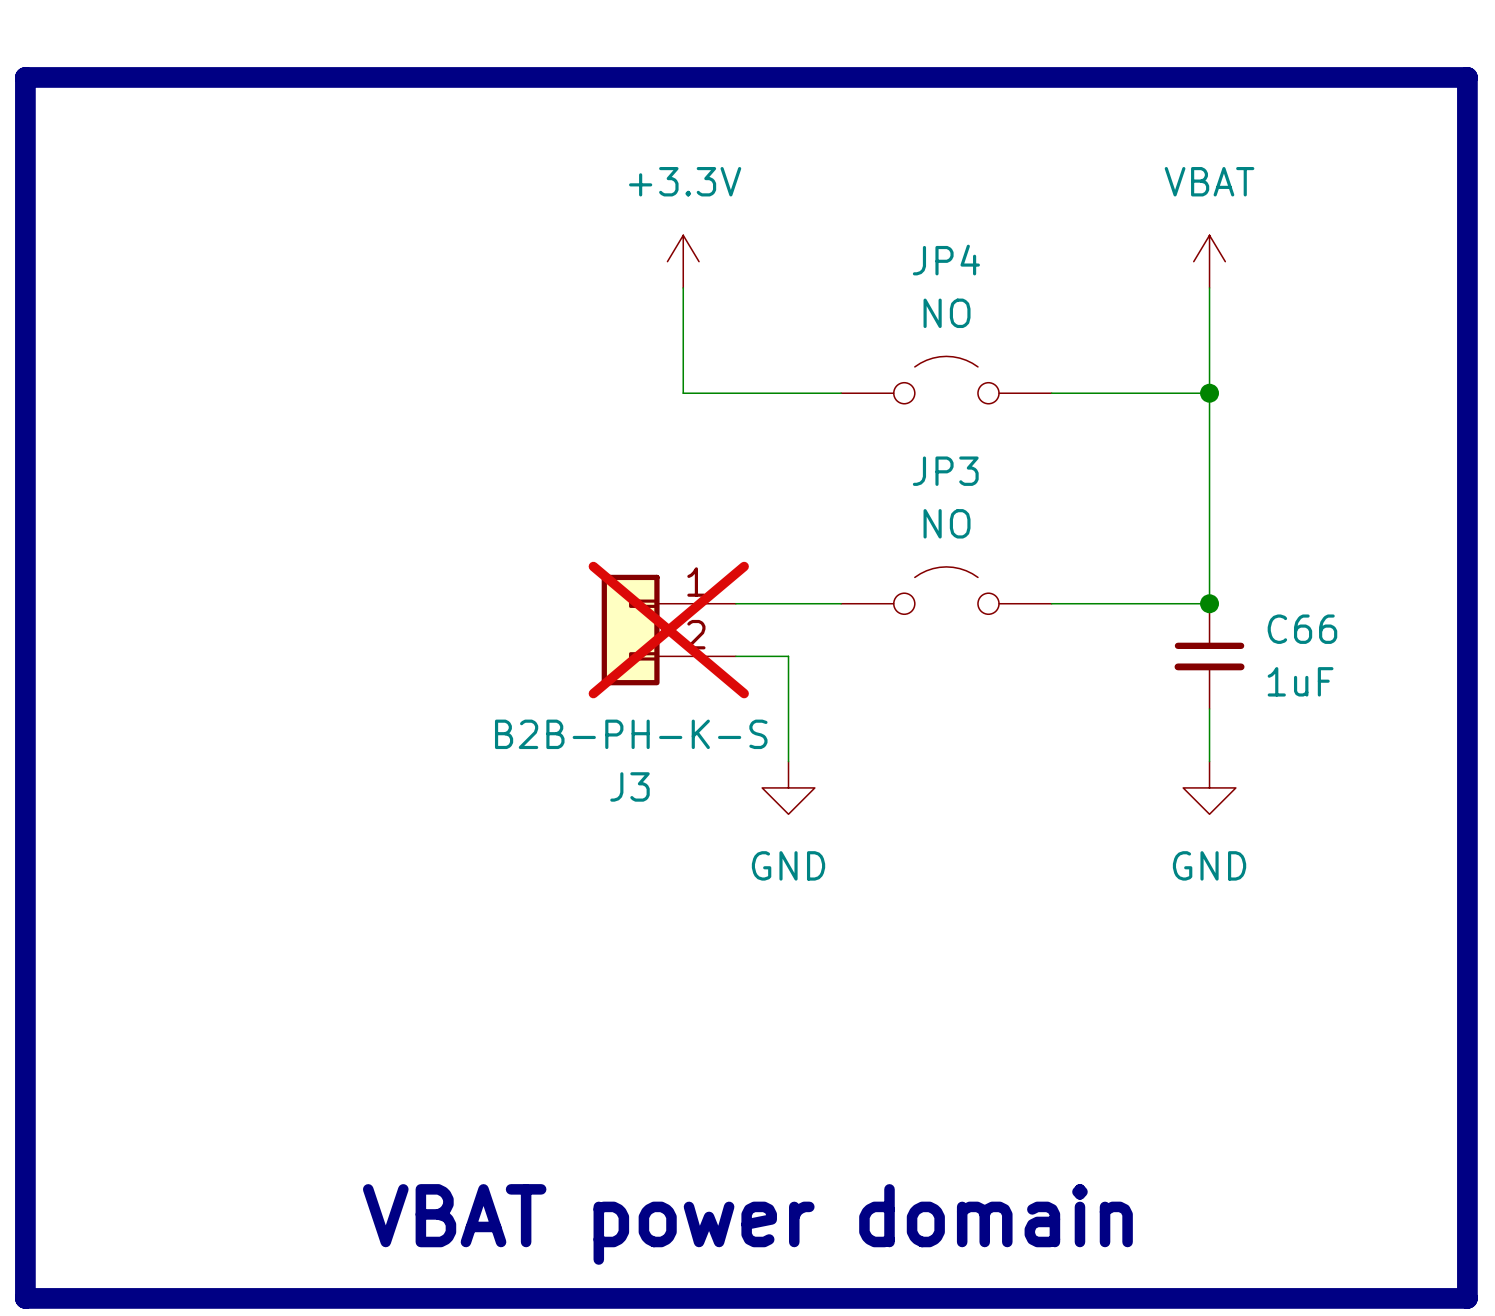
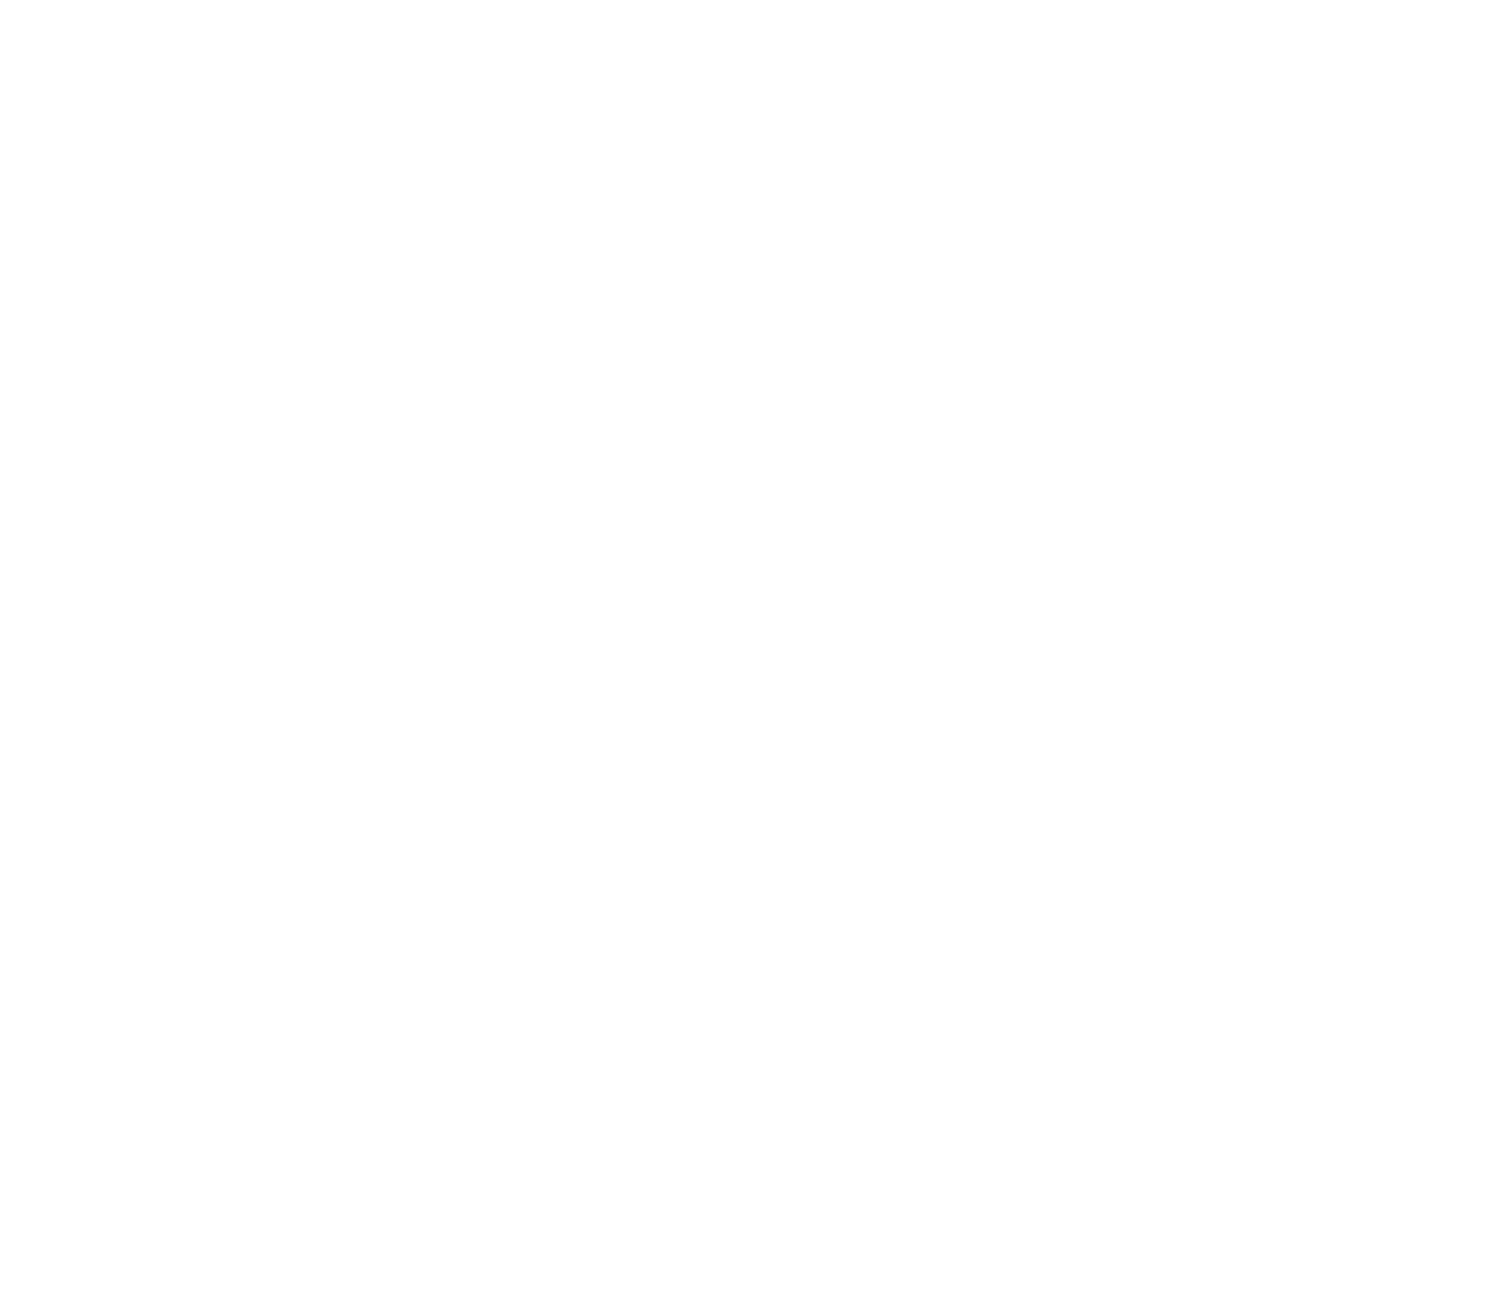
line: (25, 77) (1467, 77) (1467, 1298) (25, 1298) (25, 77) -> none
power symbol: +3.3V (683, 261) -> none
power symbol: VBAT (1209, 261) -> none
wire: (683, 287) (683, 393) (841, 393) -> none
wire: (1209, 287) (1209, 603) (1051, 603) -> none
JP4: NO (946, 380) -> none
wire: (1051, 393) (1209, 393) -> none
junction: (1209, 393) -> none
JP3: NO (946, 590) -> none
wire: (735, 603) (841, 603) -> none
junction: (1209, 603) -> none
J3: B2B-PH-K-S (668, 630) -> none
wire: (735, 656) (788, 656) (788, 761) -> none
C66: 1uF (1209, 656) -> none
wire: (1209, 708) (1209, 761) -> none
power symbol: GND (788, 787) -> none
power symbol: GND (1209, 787) -> none
text: VBAT power domain (747, 1224) -> none

